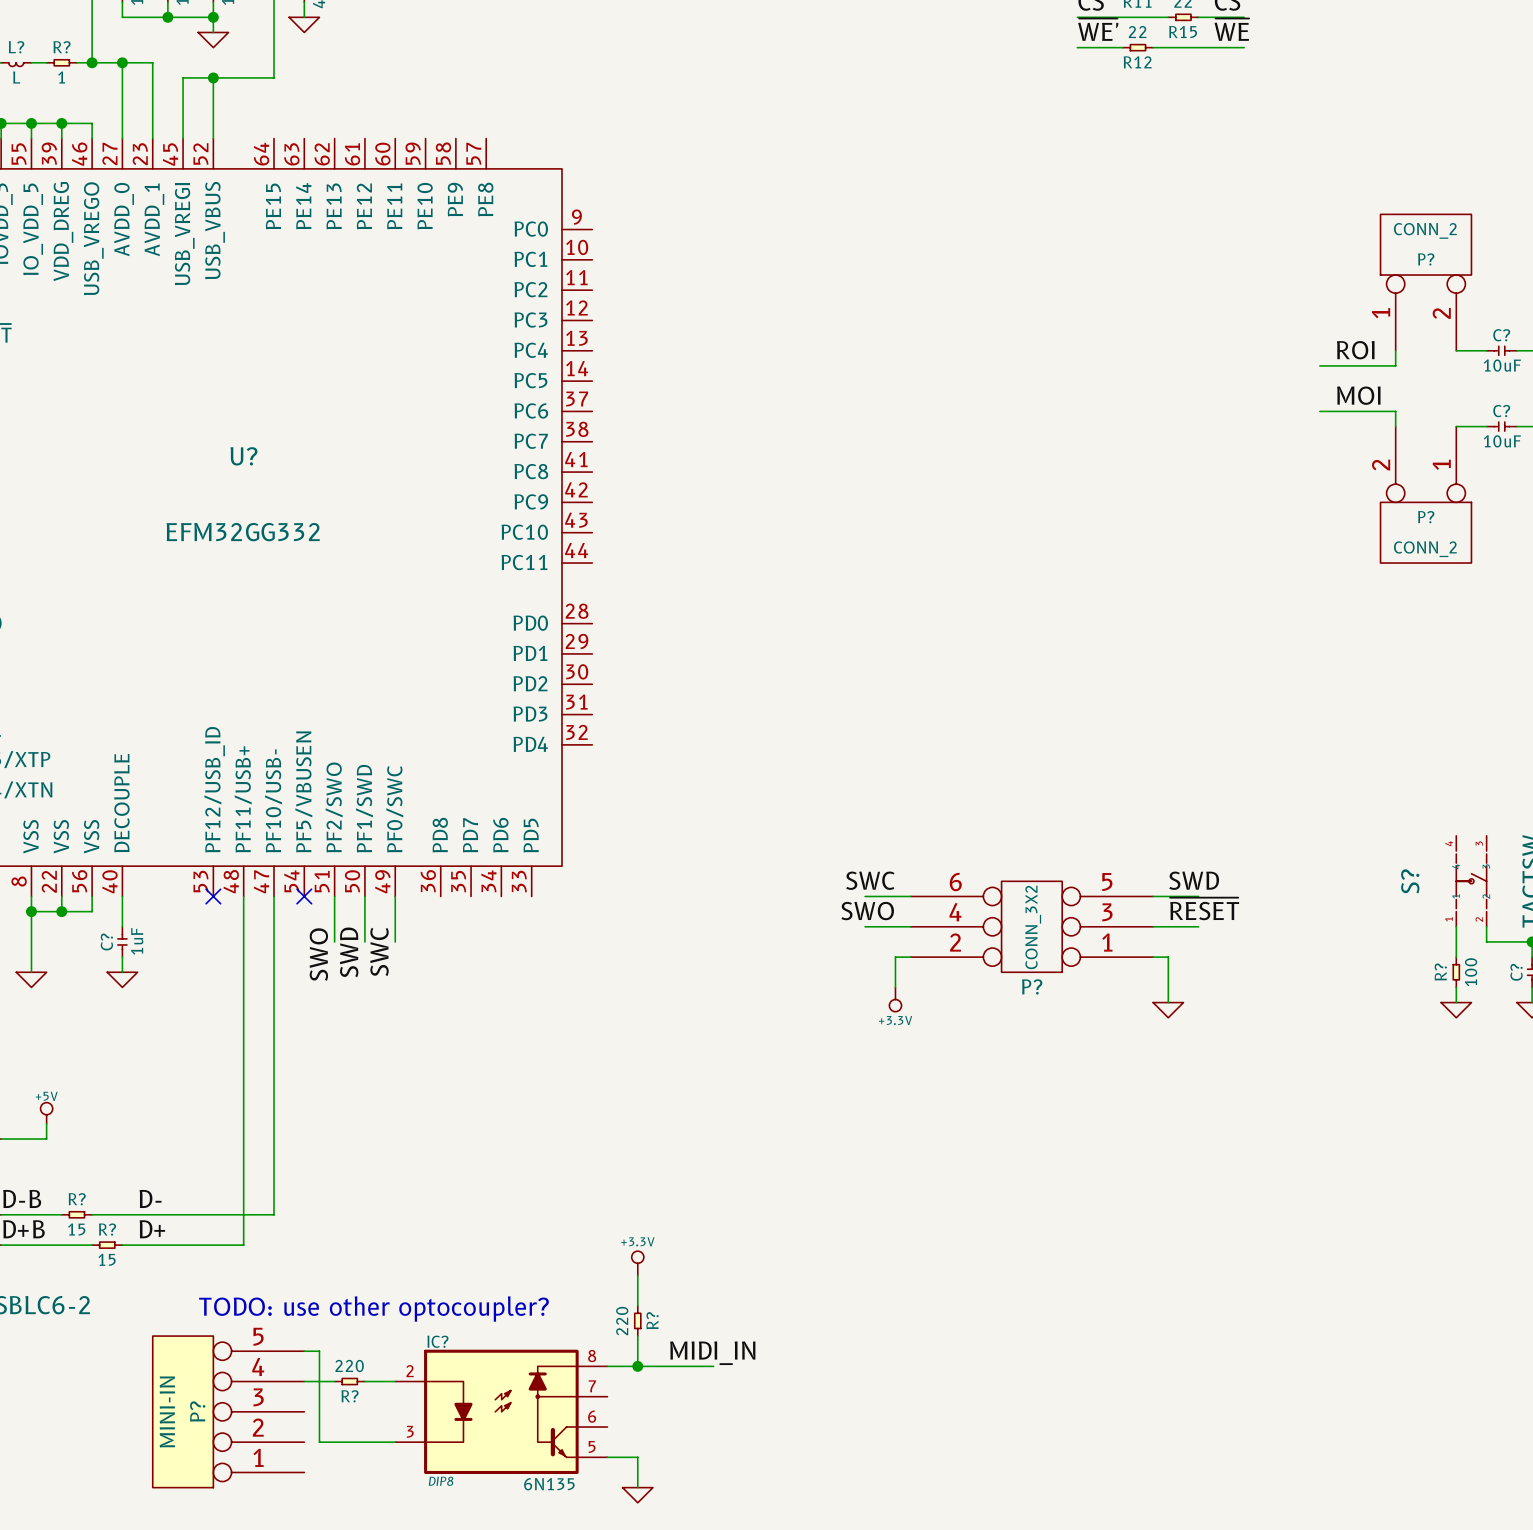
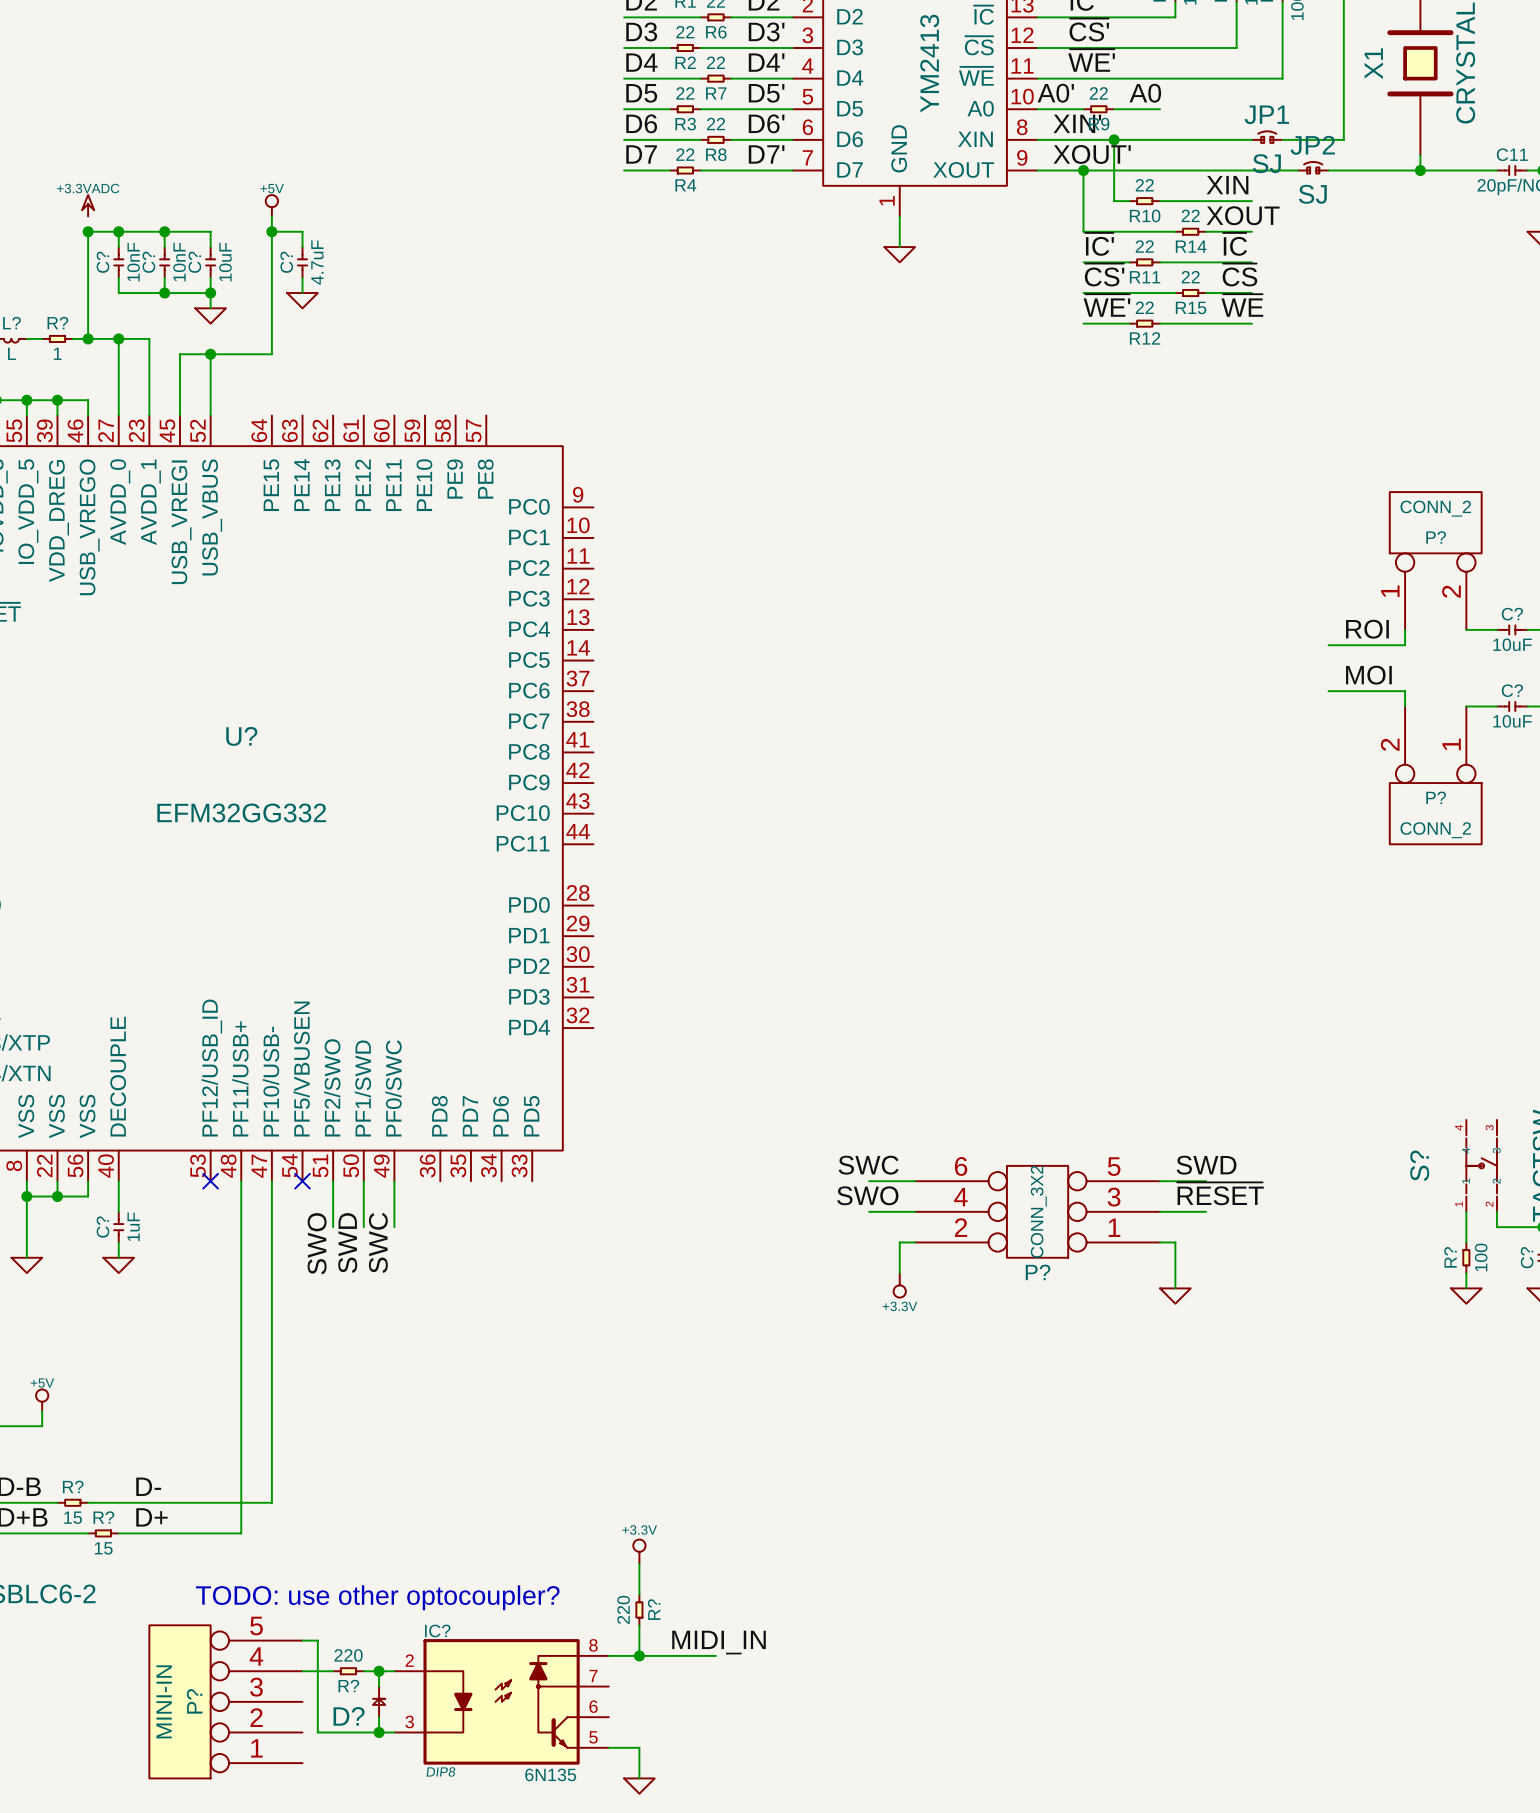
wire: none -> (379, 1671) (379, 1686)
junction: none -> (379, 1671)
D?: none -> (379, 1701)
wire: none -> (379, 1717) (379, 1732)
junction: none -> (379, 1732)

